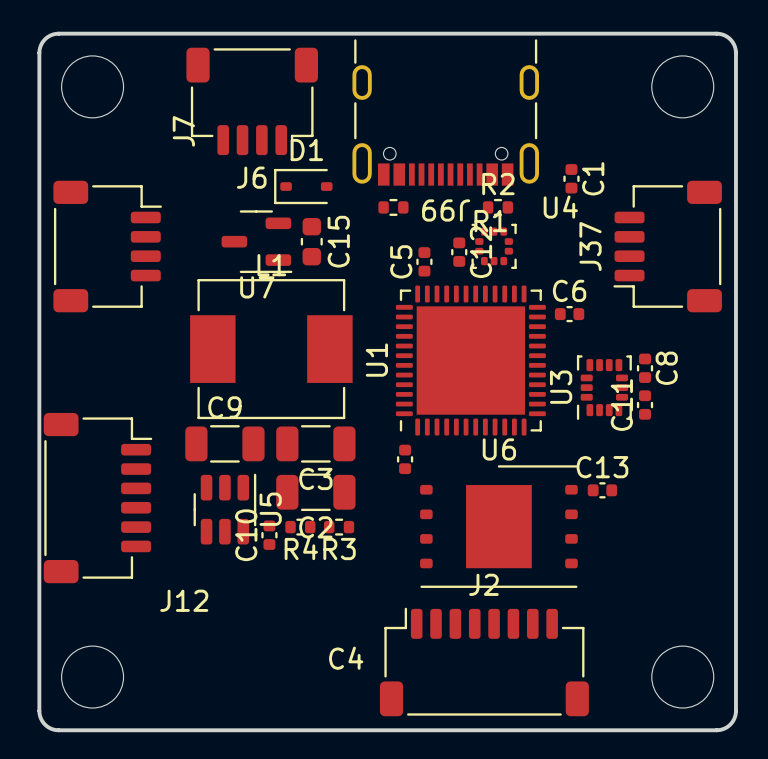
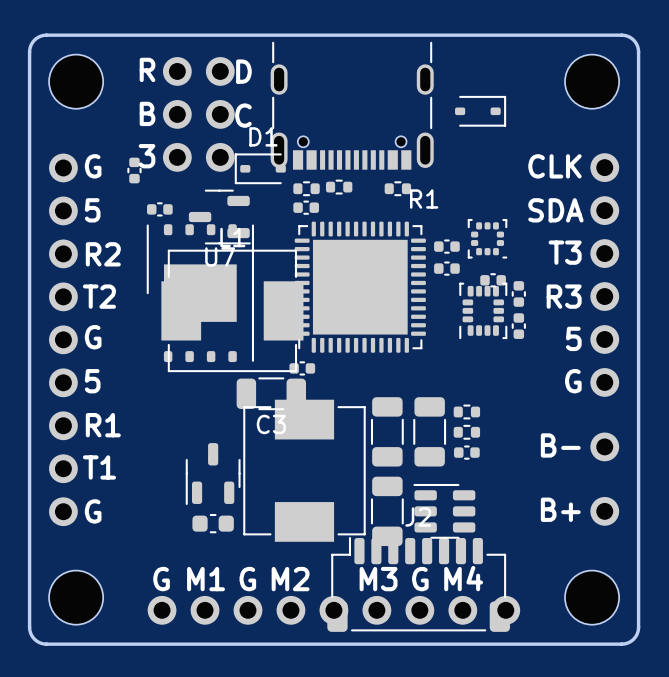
text: none -> R (147, 69)
text: none -> D (243, 71)
J6: (252, 101) -> none
J99: (445, 112) -> none
part: none -> (352, 105)
part: none -> (480, 111)
text: none -> B (147, 113)
part: none -> (198, 114)
text: none -> C (243, 115)
text: none -> 3 (147, 156)
C1: (571, 178) -> none
text: none -> G (93, 166)
text: none -> CLK (554, 166)
part: none -> (134, 170)
R2: (497, 207) -> none
part: none -> (306, 188)
part: none -> (397, 188)
part: none -> (306, 207)
part: none -> (159, 209)
text: none -> 5 (92, 210)
text: none -> SDA (555, 210)
C15: (311, 241) -> none
J7: (107, 246) -> none
U4: (494, 246) -> none
J37: (667, 246) -> none
C12: (459, 252) -> none
C5: (424, 261) -> none
part: none -> (487, 238)
part: none -> (446, 246)
text: none -> T3 (565, 252)
text: none -> R2 (103, 254)
C6 name: C6 (569, 290) -> none
part: none -> (446, 268)
part: none -> (360, 287)
part: none -> (200, 293)
part: none -> (518, 293)
text: none -> T2 (99, 296)
text: none -> R3 (564, 296)
part: none -> (483, 310)
U1: (470, 360) -> none
part: none -> (518, 326)
C8: (645, 368) -> none
text: none -> G (93, 337)
text: none -> 5 (573, 338)
part: none -> (604, 339)
part: none -> (63, 339)
U3: (604, 387) -> none
C11: (645, 405) -> none
part: none -> (302, 368)
text: none -> 5 (92, 381)
text: none -> G (573, 381)
C9: (224, 443) -> none
C4: (405, 459) -> none
part: none -> (466, 411)
text: none -> R1 (103, 425)
part: none -> (387, 431)
part: none -> (429, 431)
part: none -> (466, 432)
C13: (602, 490) -> none
C2: (315, 492) -> none
J12: (97, 498) -> none
text: none -> B- (560, 445)
U5: (224, 509) -> none
part: none -> (466, 452)
U6: (498, 526) -> none
R4: (300, 527) -> none
R3: (339, 527) -> none
text: none -> T1 (99, 467)
part: none -> (304, 470)
part: none -> (213, 474)
C10: (269, 535) -> none
text: none -> B+ (560, 509)
text: none -> G (93, 511)
part: none -> (387, 511)
part: none -> (444, 511)
part: none -> (213, 523)
text: none -> G (161, 579)
text: none -> M1 (206, 579)
text: none -> G (247, 579)
text: none -> M2 (290, 579)
text: none -> M3 (378, 579)
text: none -> G (420, 579)
text: none -> M4 (463, 578)
part: none -> (333, 610)

